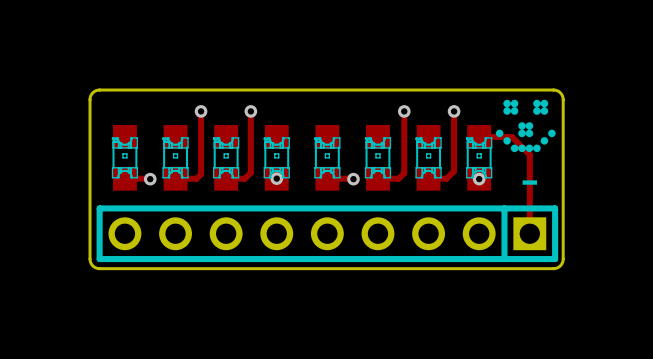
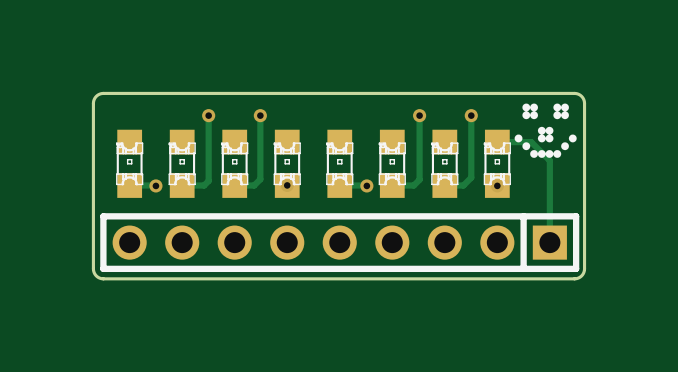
text: - (529, 182) -> none

